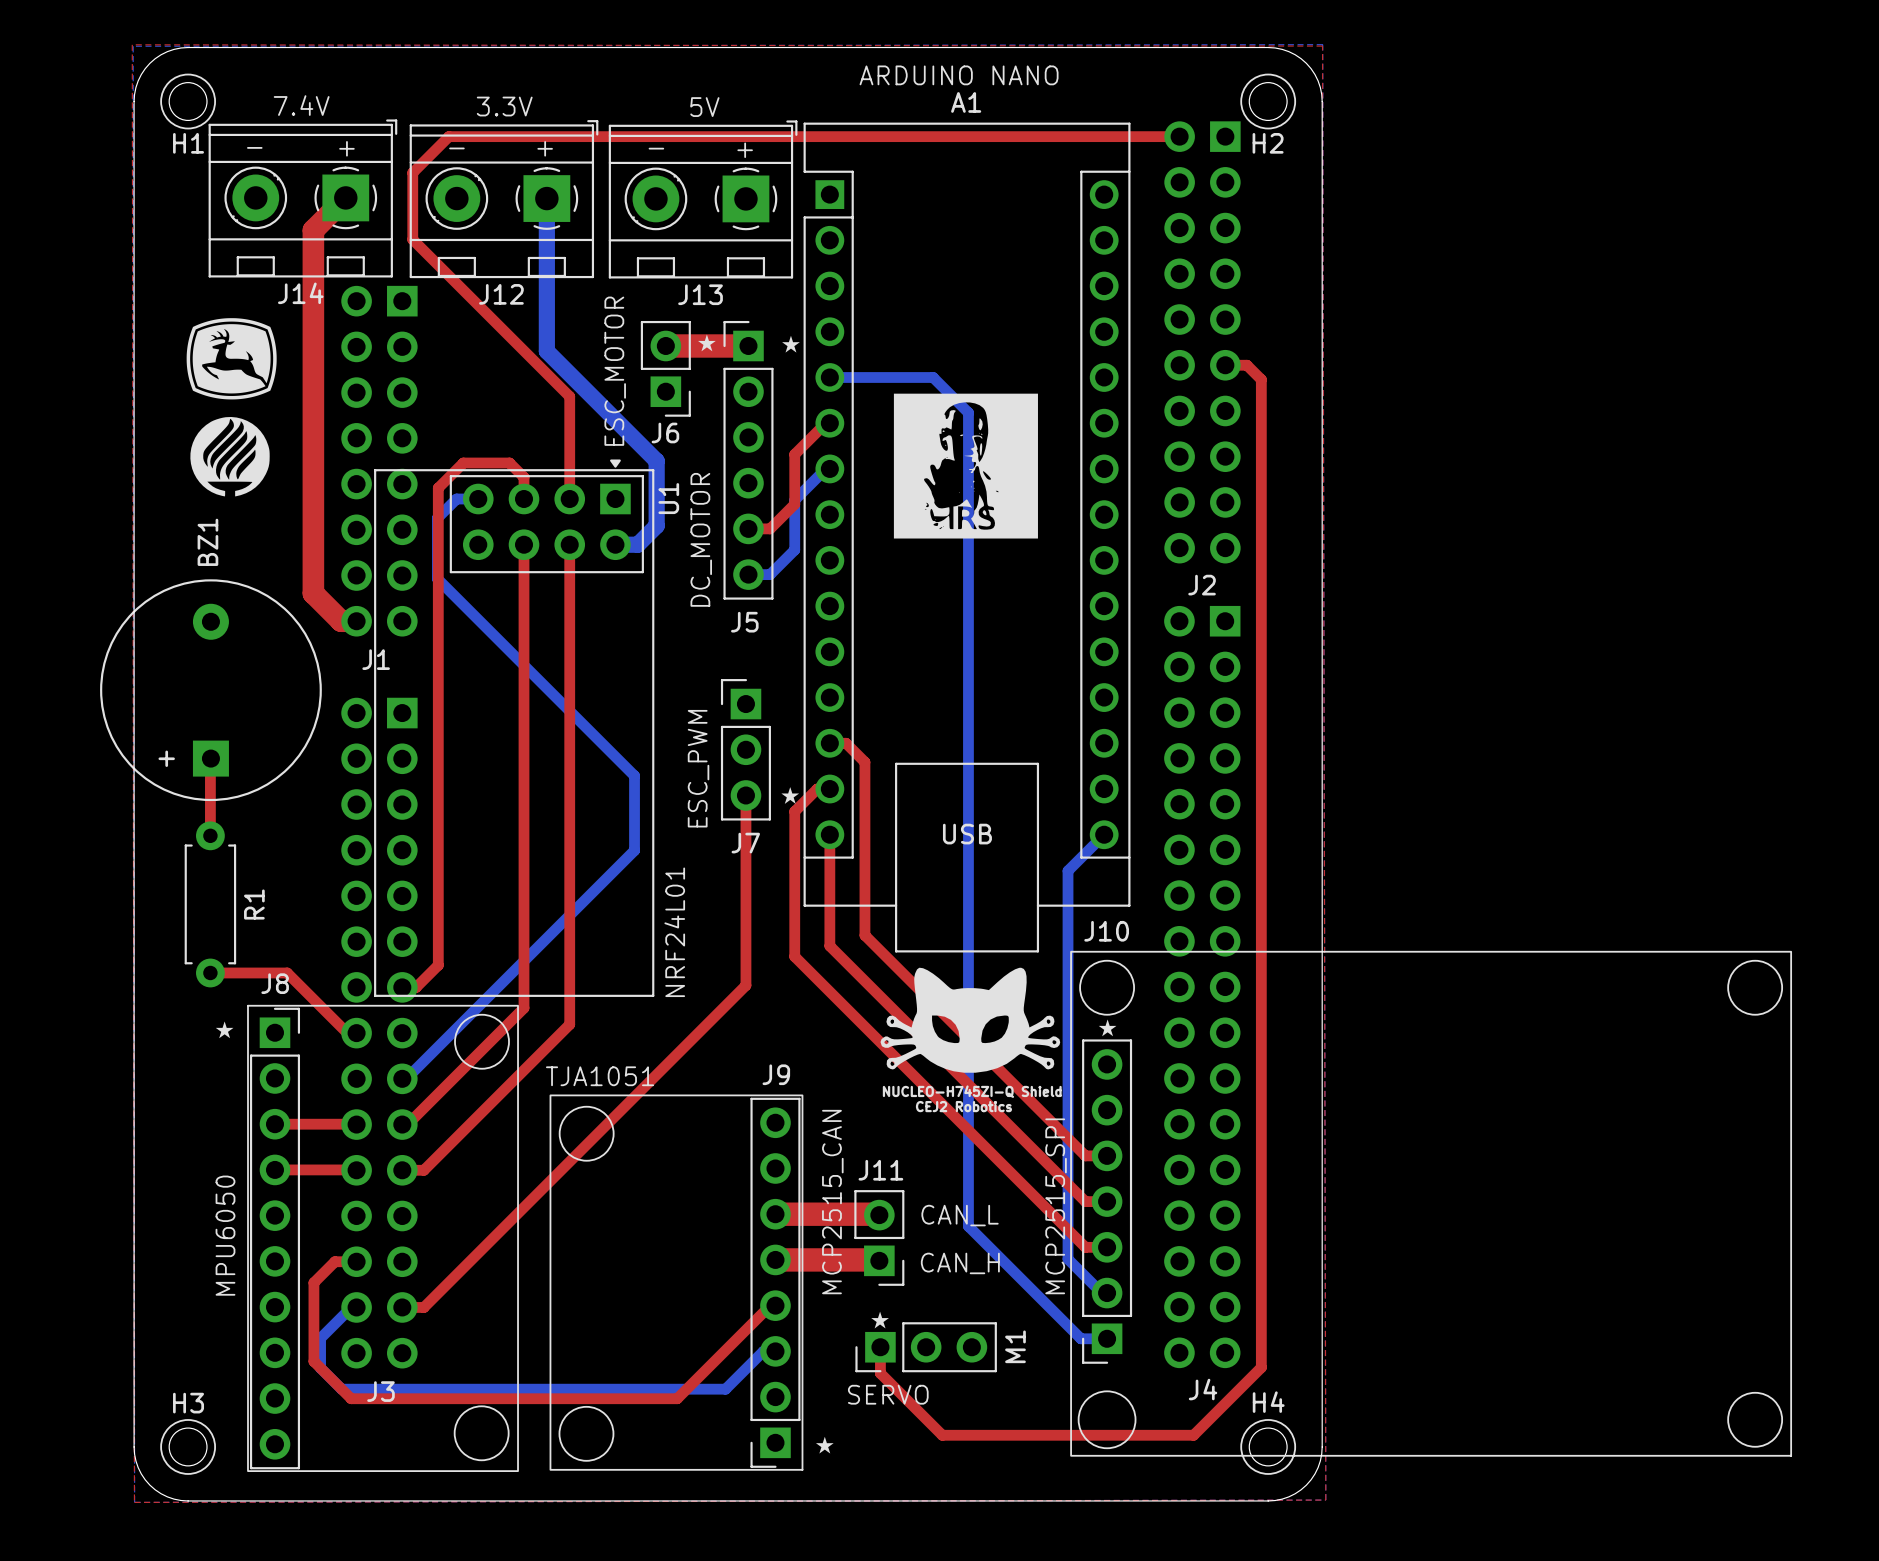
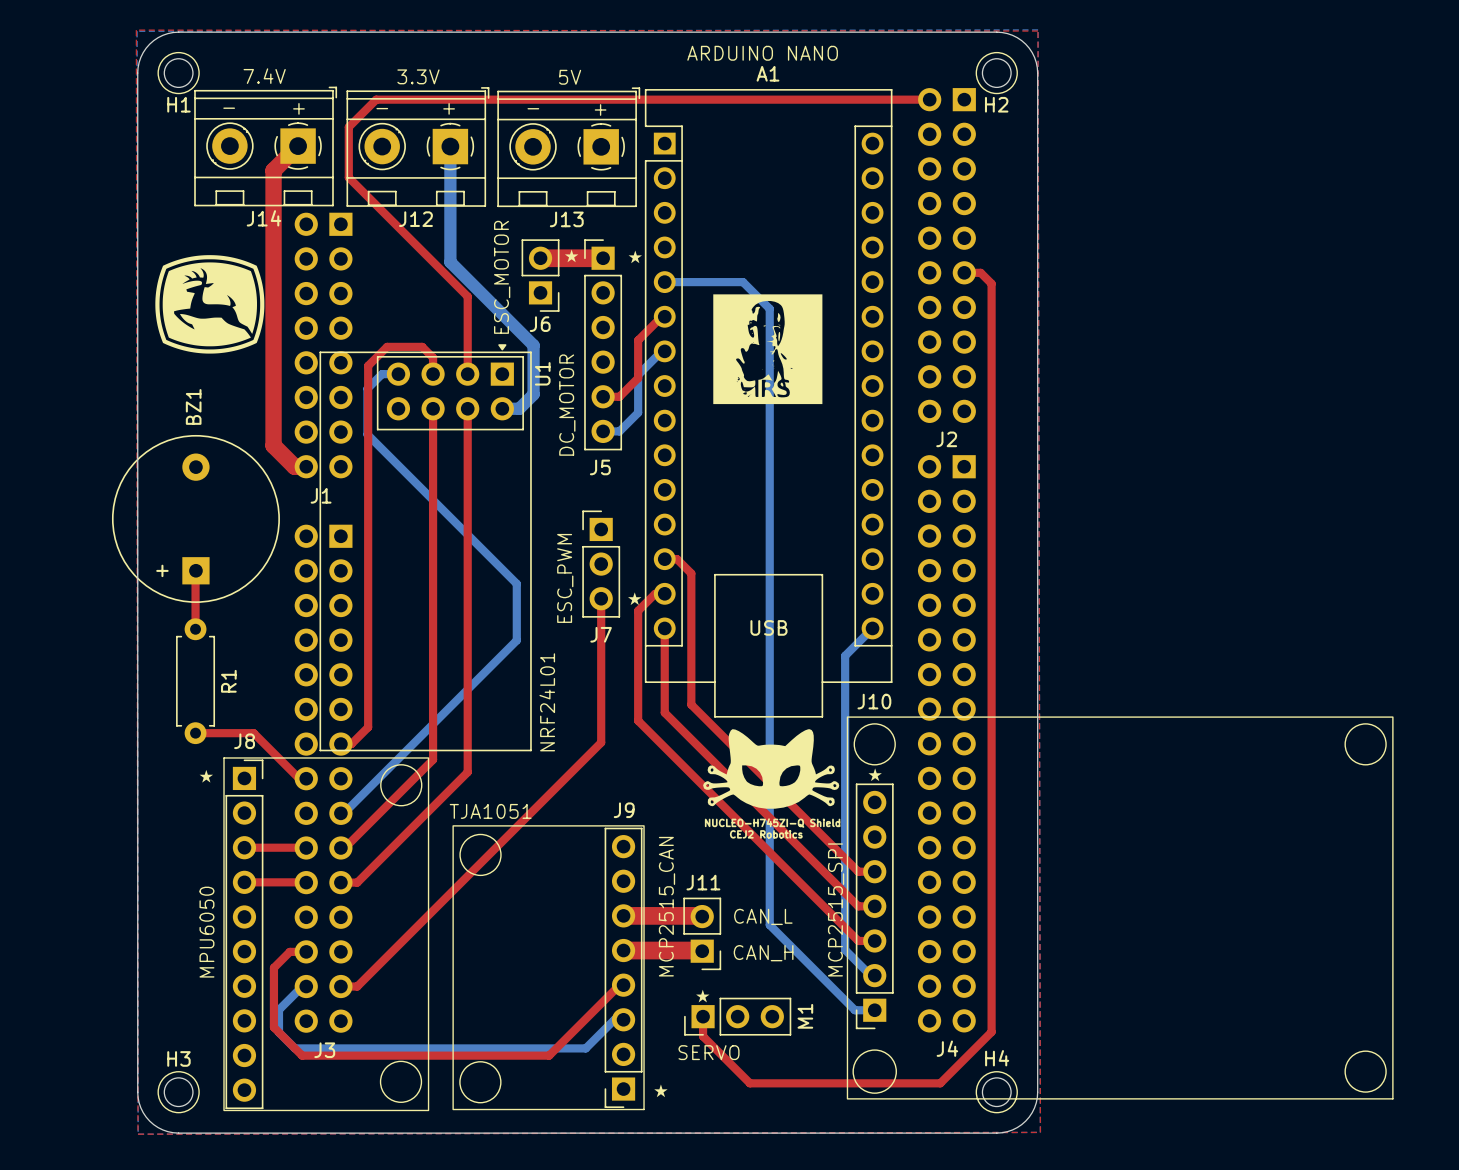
drawing: [186, 318, 277, 497] -> none
drawing: none -> [155, 255, 265, 354]

